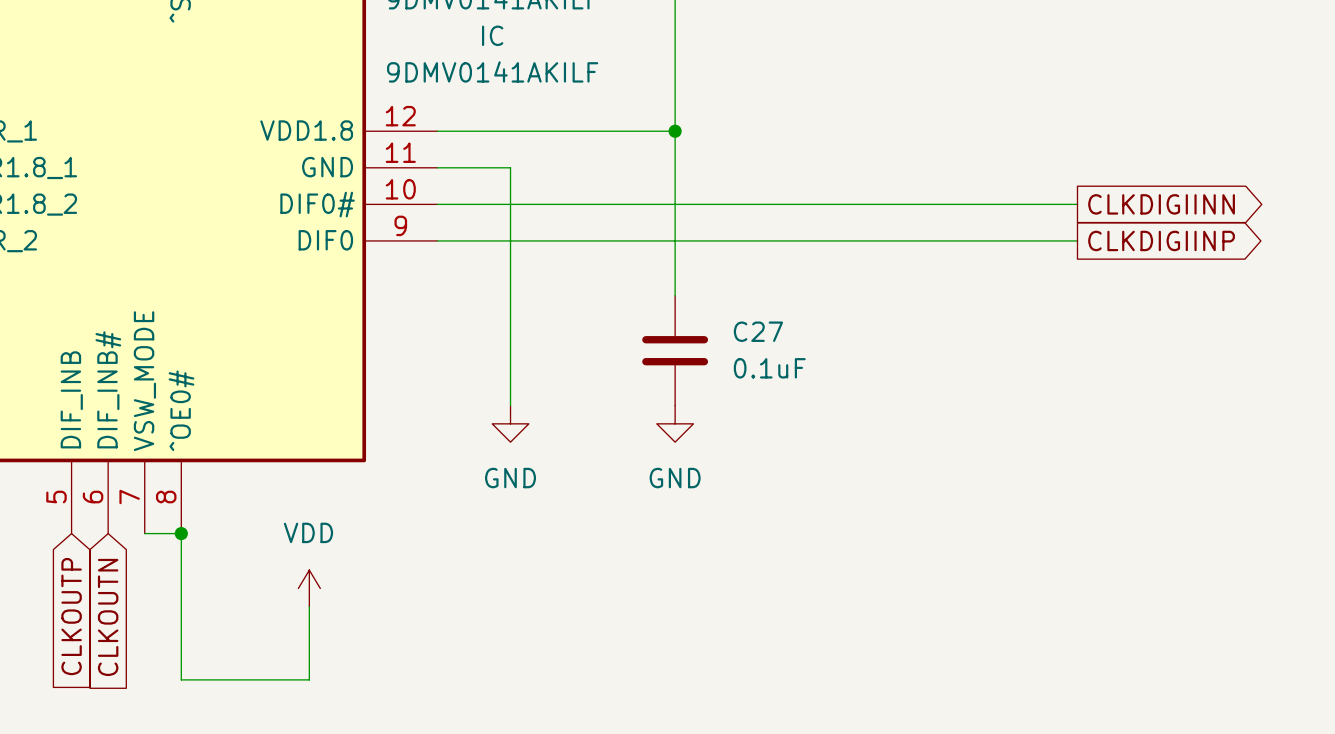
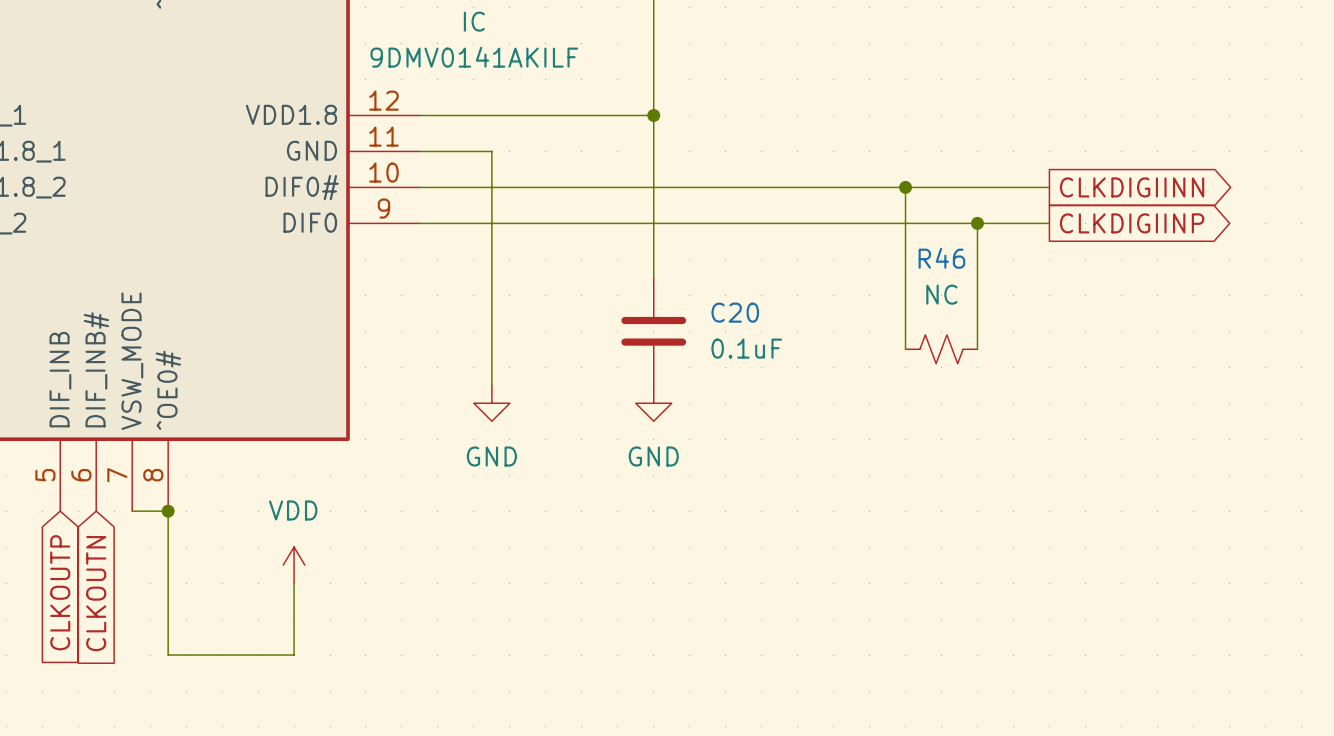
wire: none -> (905, 187) (905, 349)
junction: none -> (905, 187)
wire: none -> (977, 223) (977, 349)
junction: none -> (977, 223)
C27 name: C27 (758, 331) -> C20 (735, 312)
R46: none -> NC (941, 349)

